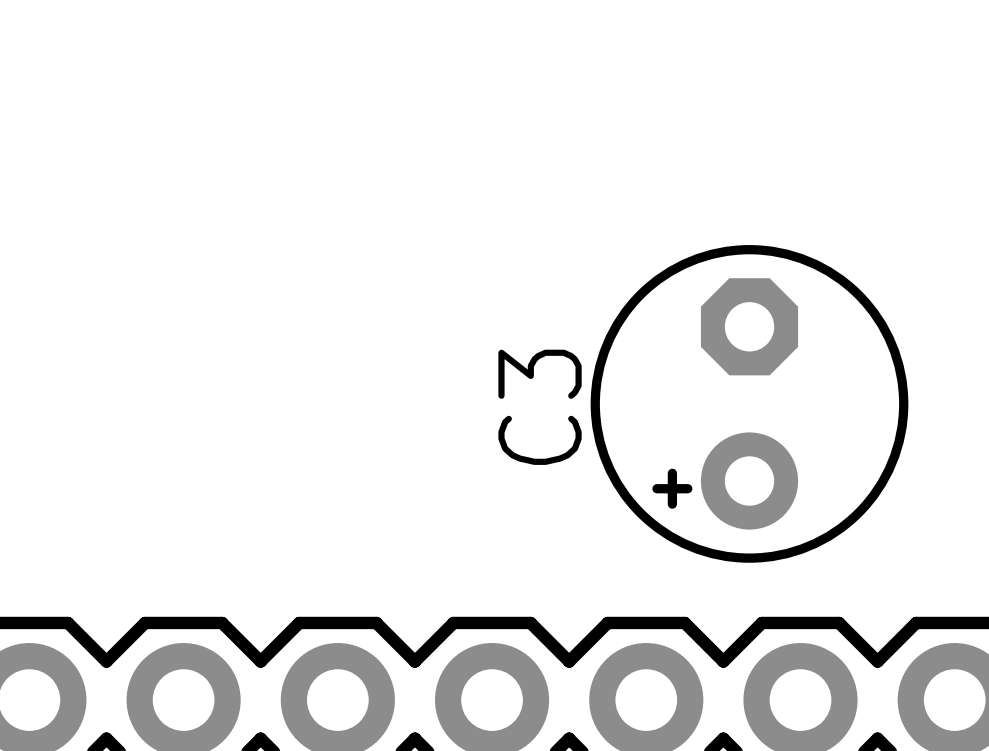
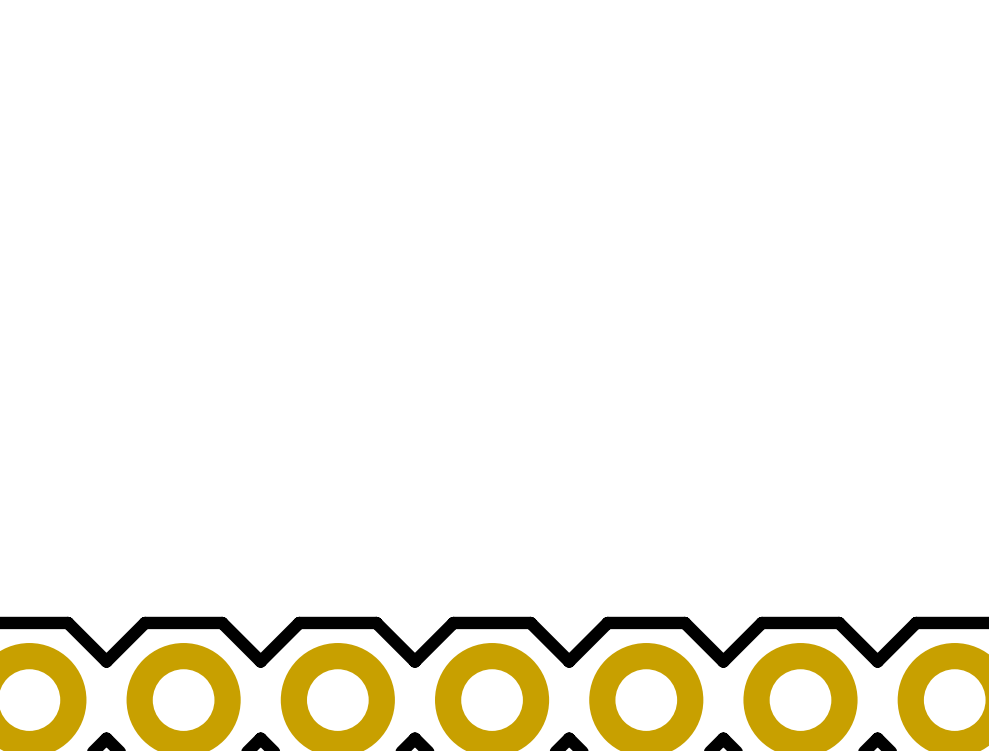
C3: (749, 403) -> none

